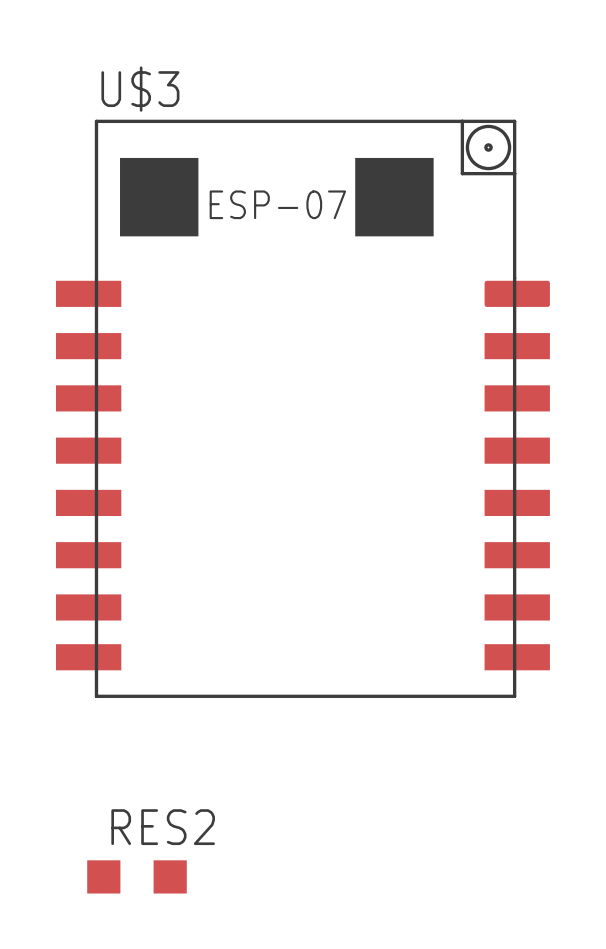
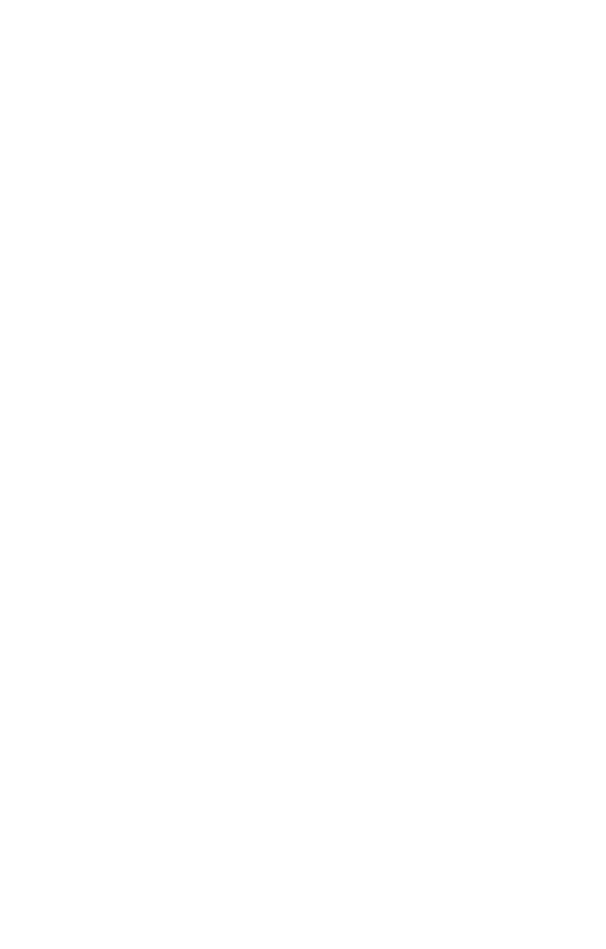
U$3: (302, 408) -> none
RES2: (136, 876) -> none

